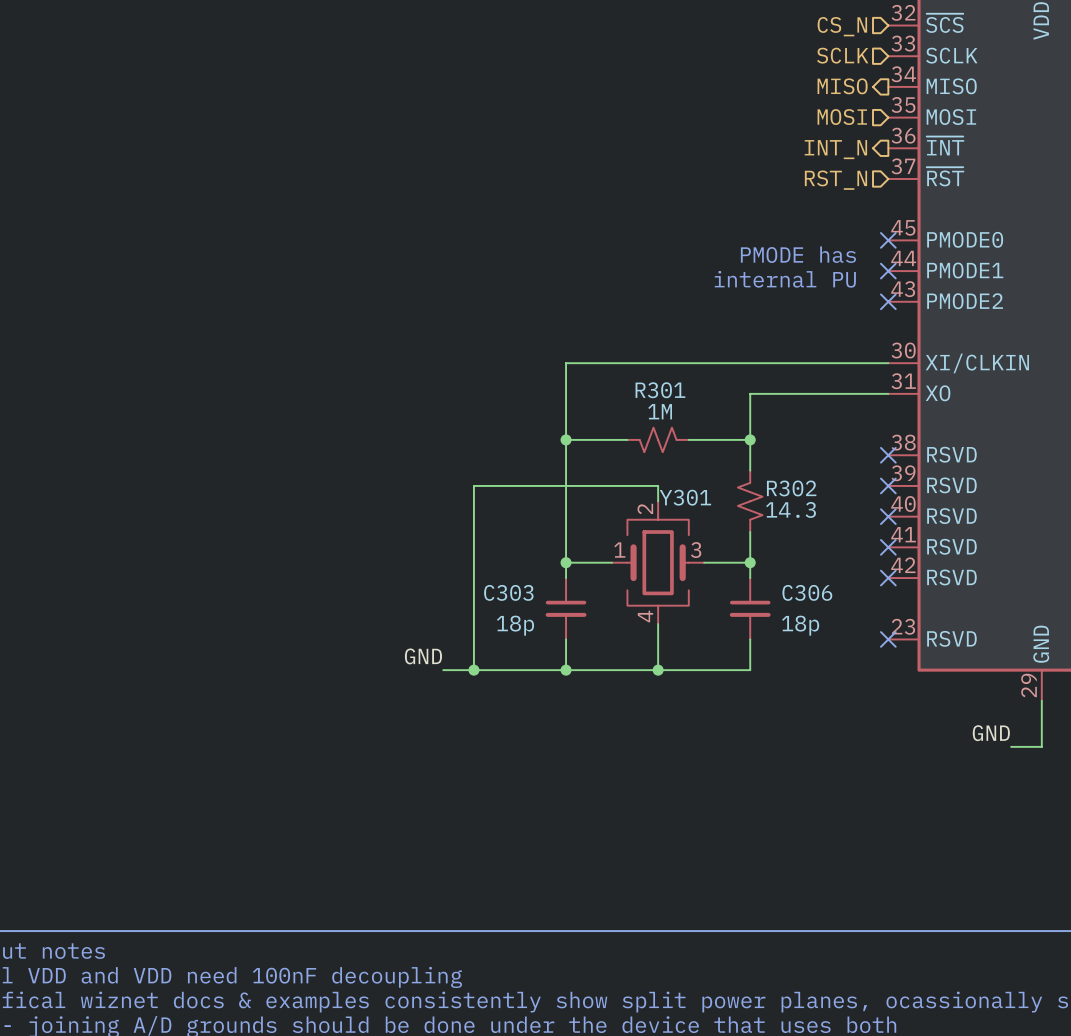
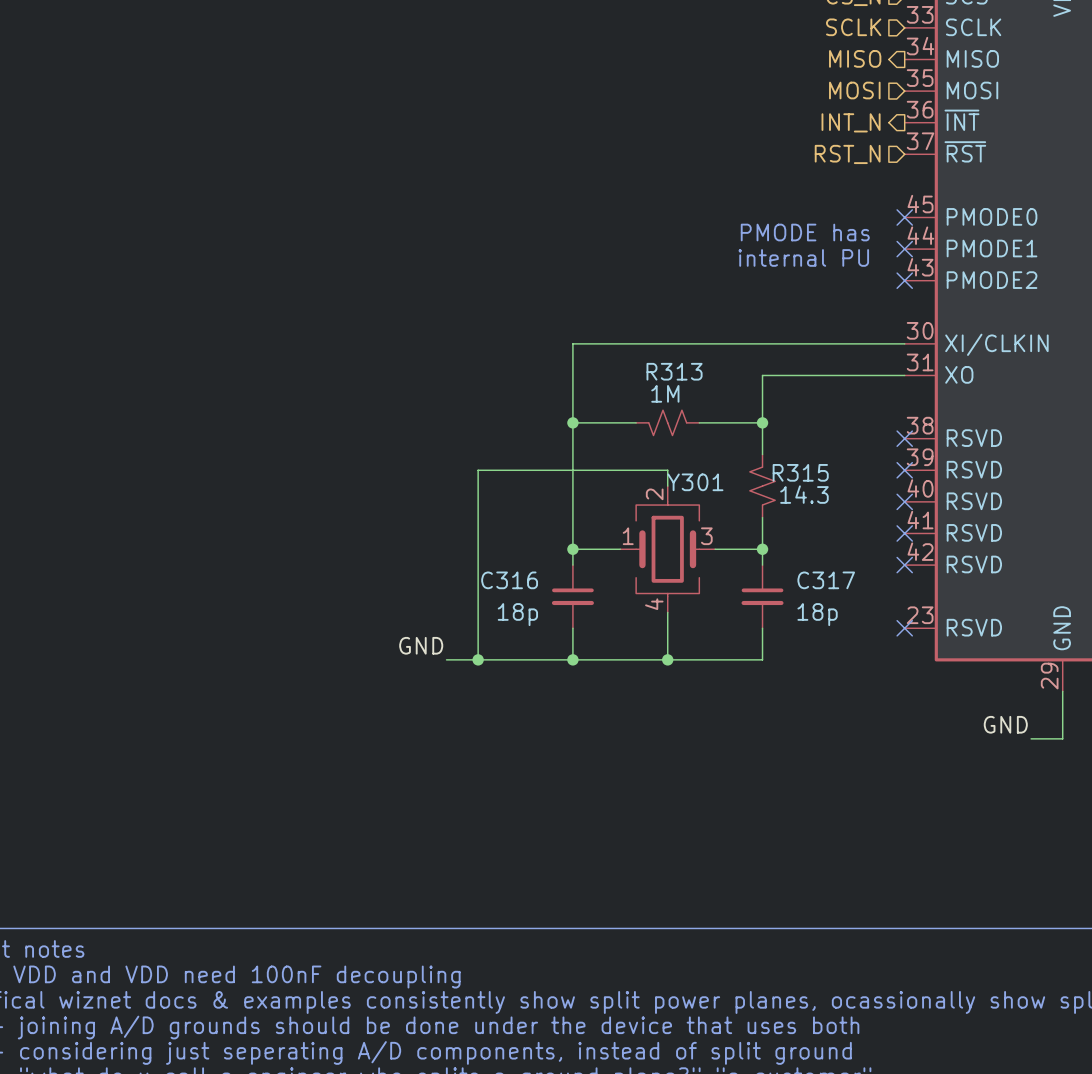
R301 name: R301 (660, 390) -> R313 (674, 371)
R302 name: R302 (791, 488) -> R315 (800, 472)
C303 name: C303 (508, 592) -> C316 (509, 580)
C306 name: C306 (807, 592) -> C317 (826, 580)

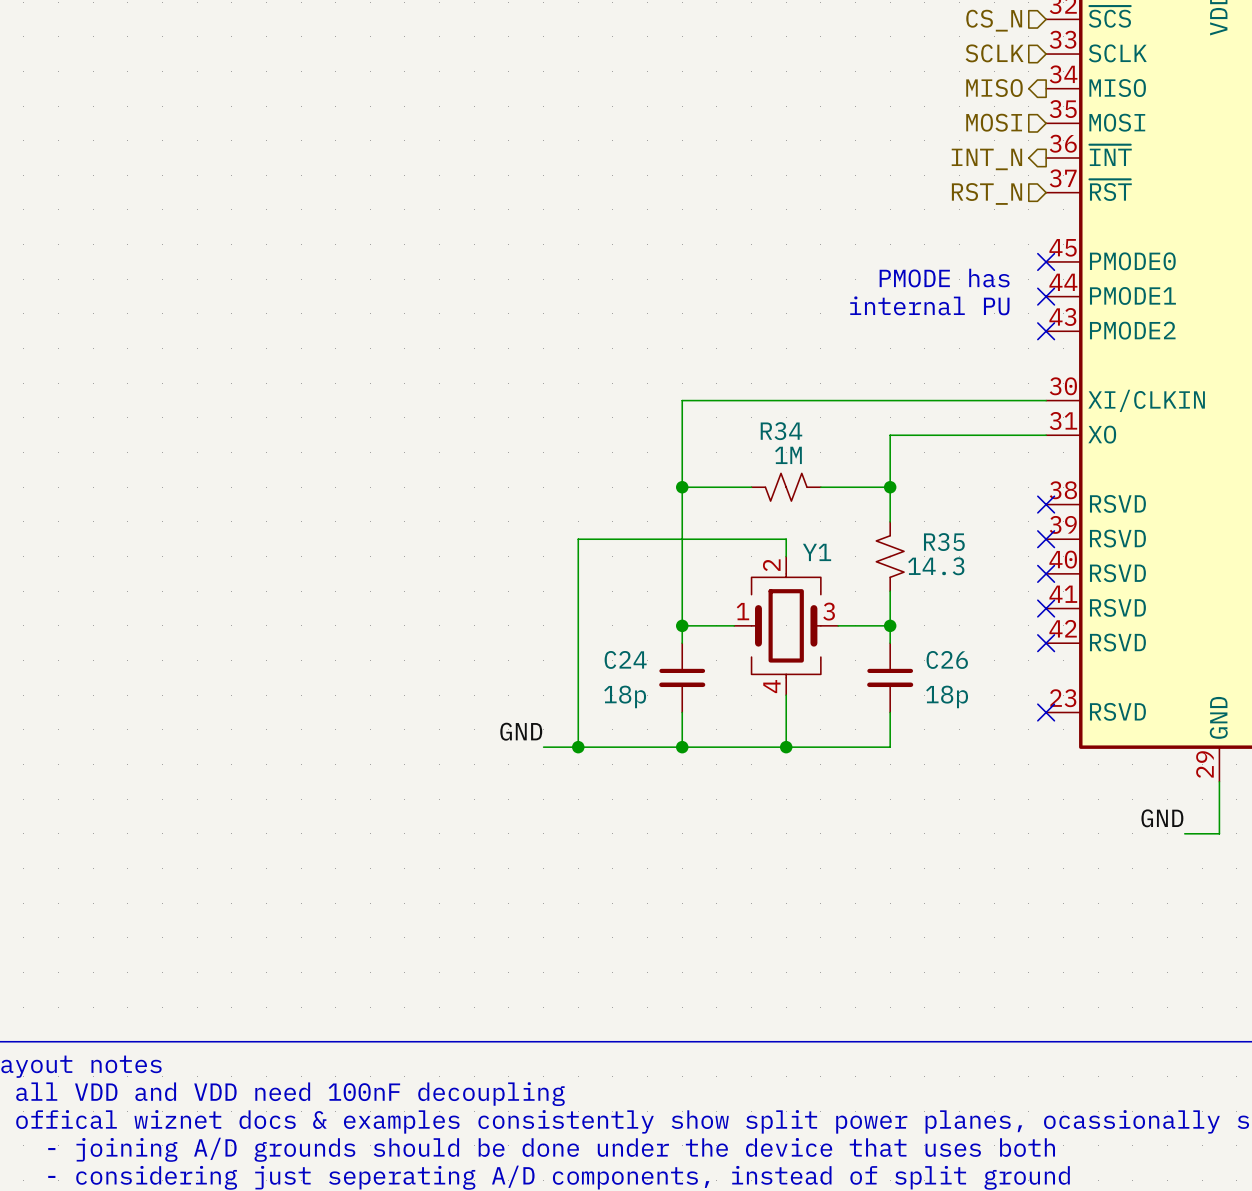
R313 name: R313 (674, 371) -> R34 (781, 431)
R315 name: R315 (800, 472) -> R35 (944, 542)
Y301 name: Y301 (695, 482) -> Y1 (817, 552)
C316 name: C316 (509, 580) -> C24 (625, 659)
C317 name: C317 (826, 580) -> C26 (947, 659)

